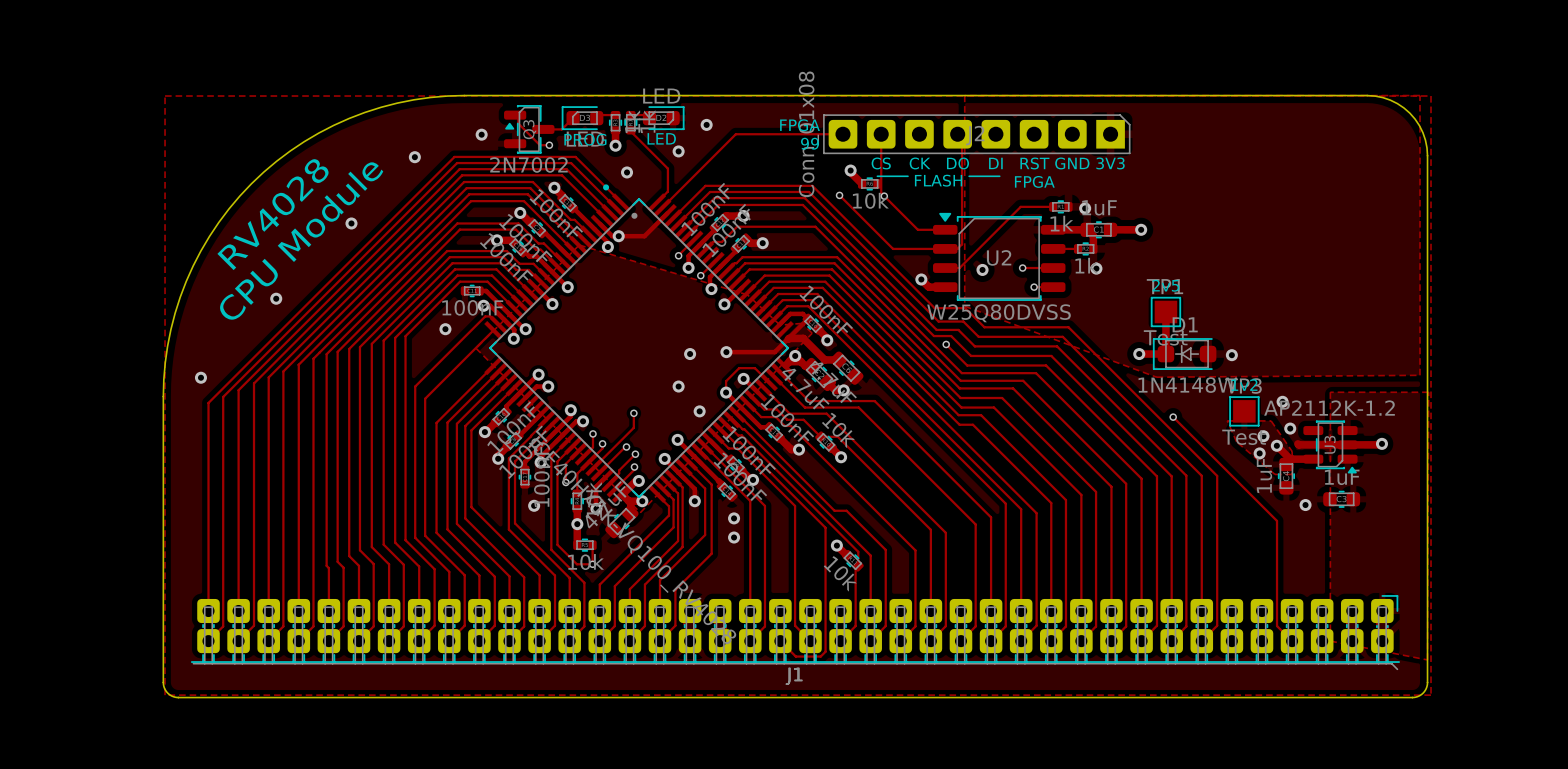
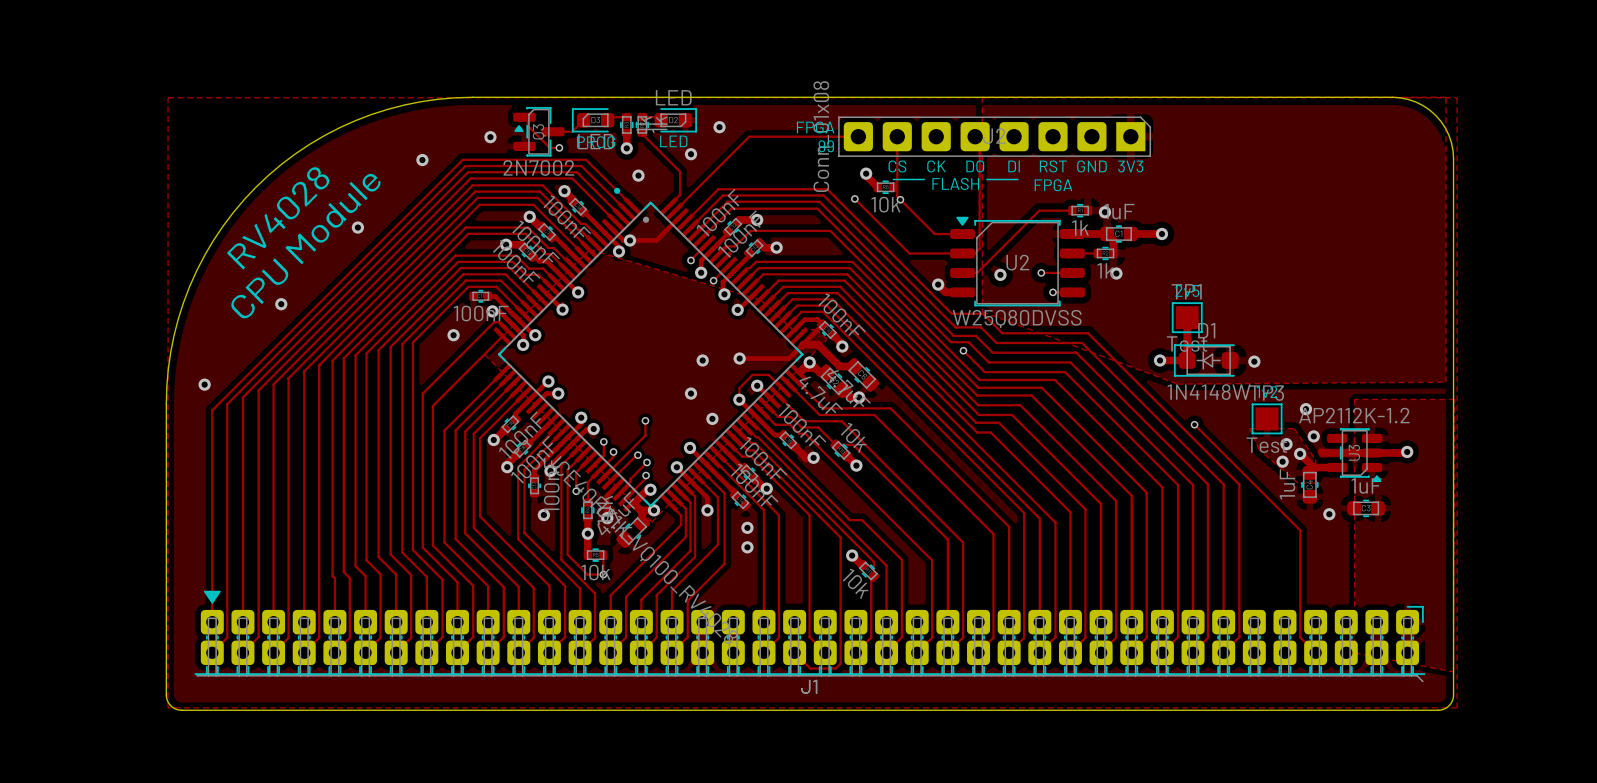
J1 footprint: [190, 595, 1400, 671] -> [194, 590, 1426, 683]

